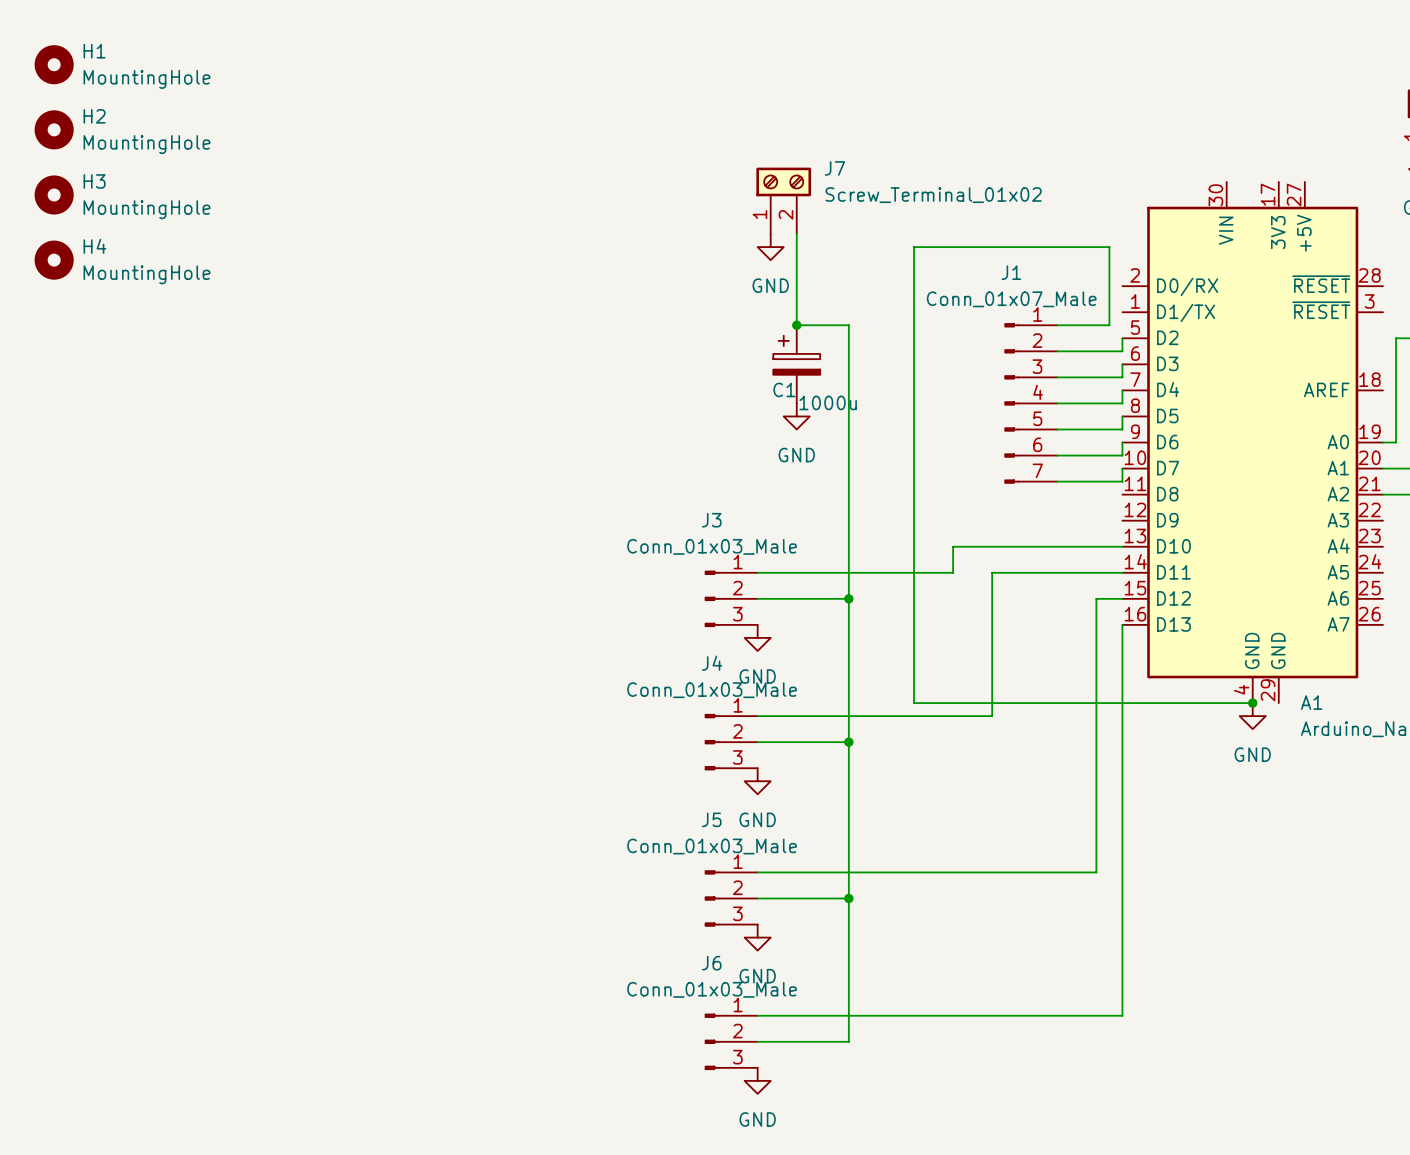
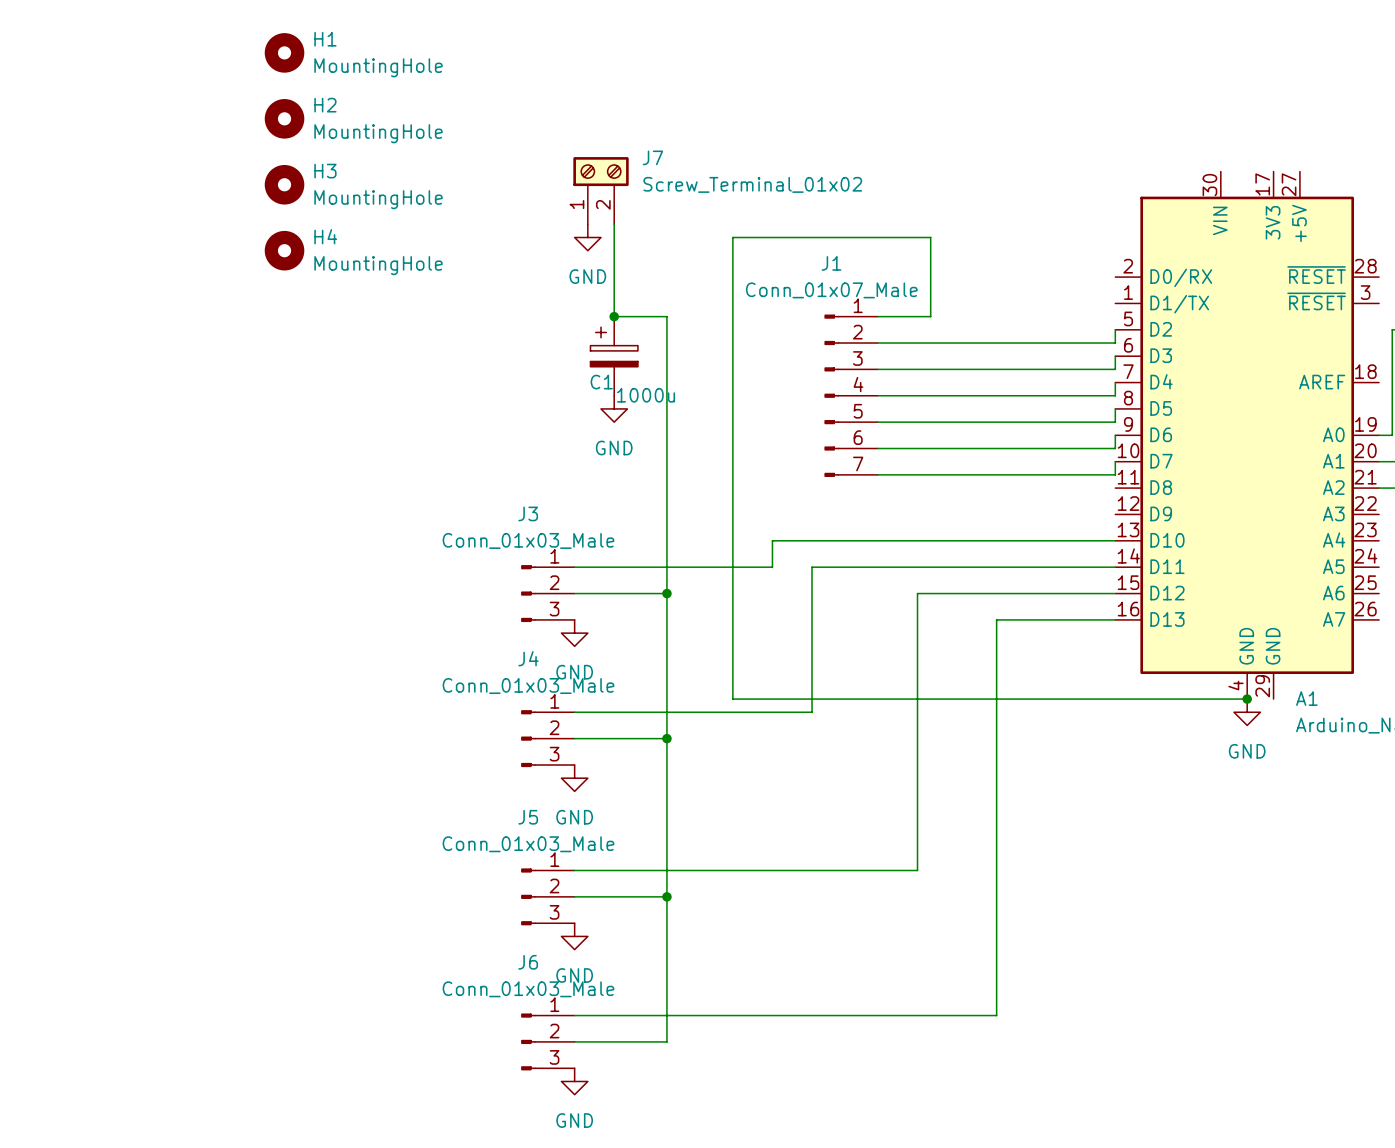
H1 position: (54, 64) -> (284, 52)
H2 position: (54, 129) -> (284, 118)
H3 position: (54, 194) -> (284, 184)
J7 position: (783, 200) -> (601, 190)
wire: (796, 234) (796, 325) (848, 325) (848, 1041) (757, 1041) -> (614, 224) (614, 316) (666, 316) (666, 1041) (574, 1041)
power symbol: none -> GND (587, 237)
power symbol: GND (770, 247) -> none
wire: (913, 247) (913, 703) -> (904, 237) (732, 237) (732, 699) (904, 699)
wire: (940, 247) (1109, 247) (1109, 325) (1057, 325) -> (930, 237) (930, 316) (877, 316)
H4 position: (54, 260) -> (284, 250)
junction: none -> (614, 316)
junction: (796, 325) -> none
wire: none -> (877, 343) (1049, 343)
C1 position: (796, 364) -> (614, 356)
wire: none -> (877, 369) (1049, 369)
wire: none -> (877, 395) (1049, 395)
J1 position: (1030, 403) -> (851, 395)
power symbol: none -> GND (614, 408)
power symbol: GND (796, 416) -> none
wire: none -> (877, 422) (1049, 422)
wire: none -> (877, 448) (1049, 448)
wire: none -> (877, 474) (1049, 474)
wire: (953, 546) (953, 572) -> (983, 567) (943, 567)
wire: none -> (574, 567) (746, 567)
wire: (783, 572) (822, 572) -> (772, 567) (772, 540) (943, 540)
wire: (992, 572) (992, 716) (822, 716) -> (812, 567) (812, 712)
junction: none -> (666, 593)
J3 position: (731, 598) -> (547, 593)
wire: (757, 598) (848, 598) -> (574, 593) (666, 593)
junction: (848, 598) -> none
wire: (1096, 598) (1096, 872) (927, 872) -> (1088, 593) (917, 593) (917, 870)
wire: (1122, 624) (1122, 1015) (1005, 1015) -> (1115, 619) (996, 619) (996, 1015)
power symbol: none -> GND (574, 633)
power symbol: GND (757, 637) -> none
wire: none -> (574, 712) (746, 712)
junction: none -> (666, 738)
J4 position: (731, 742) -> (547, 738)
wire: (757, 742) (848, 742) -> (574, 738) (666, 738)
junction: (848, 742) -> none
power symbol: none -> GND (574, 778)
power symbol: GND (757, 781) -> none
wire: none -> (574, 870) (746, 870)
junction: none -> (666, 896)
J5 position: (731, 898) -> (547, 896)
wire: (757, 898) (848, 898) -> (574, 896) (666, 896)
junction: (848, 898) -> none
power symbol: none -> GND (574, 936)
power symbol: GND (757, 937) -> none
wire: none -> (574, 1015) (746, 1015)
J6 position: (731, 1041) -> (547, 1041)
power symbol: none -> GND (574, 1081)
power symbol: GND (757, 1080) -> none

